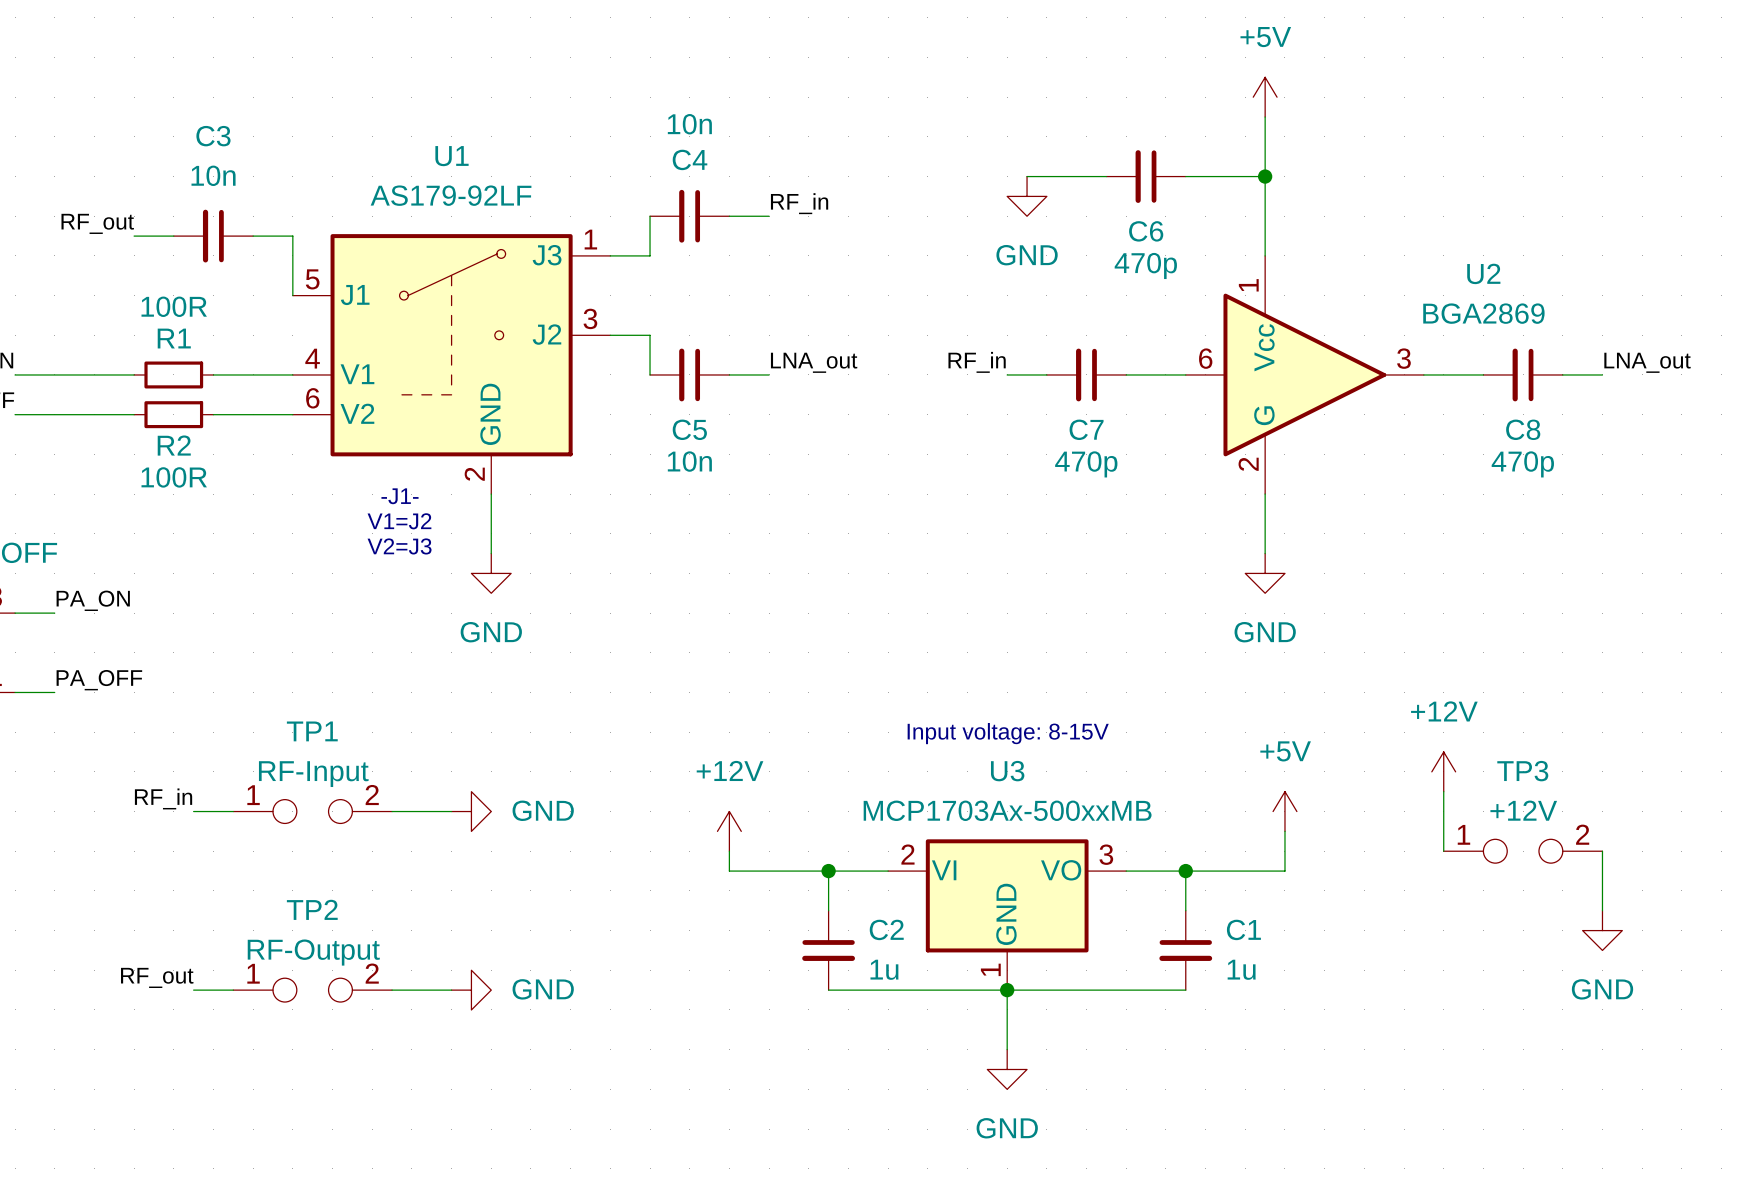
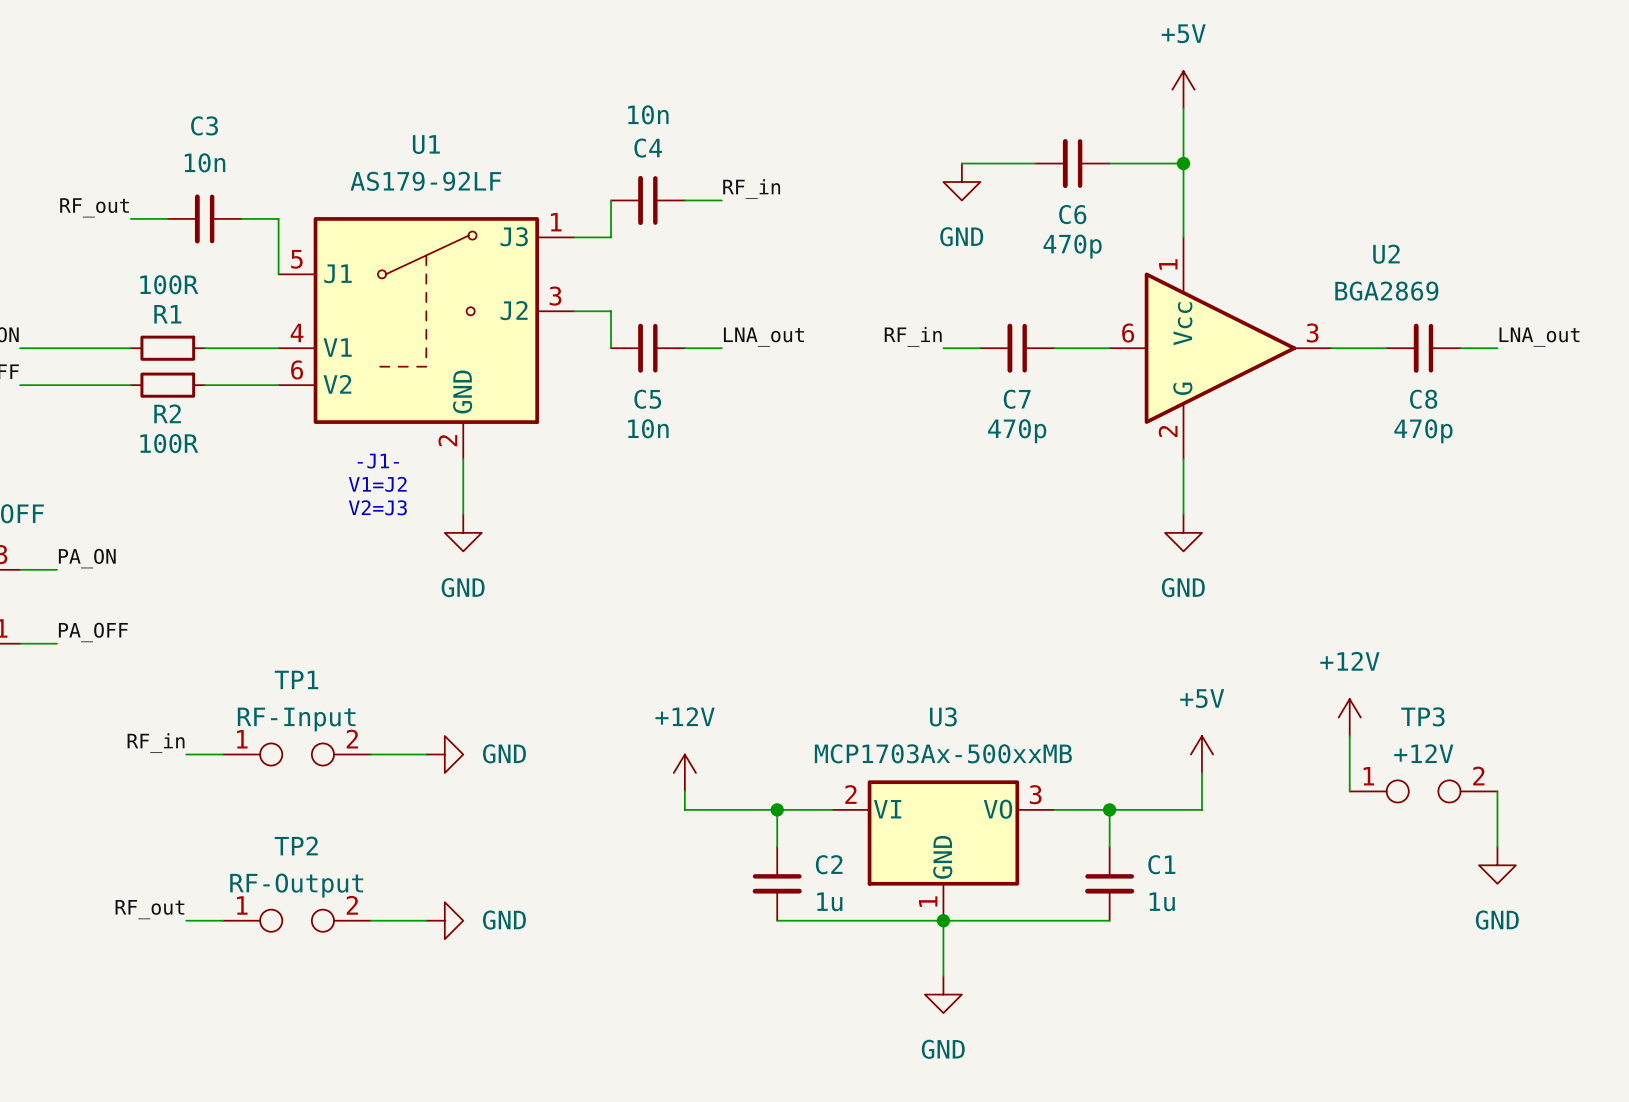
text: Input voltage: 8-15V (1008, 733) -> none

